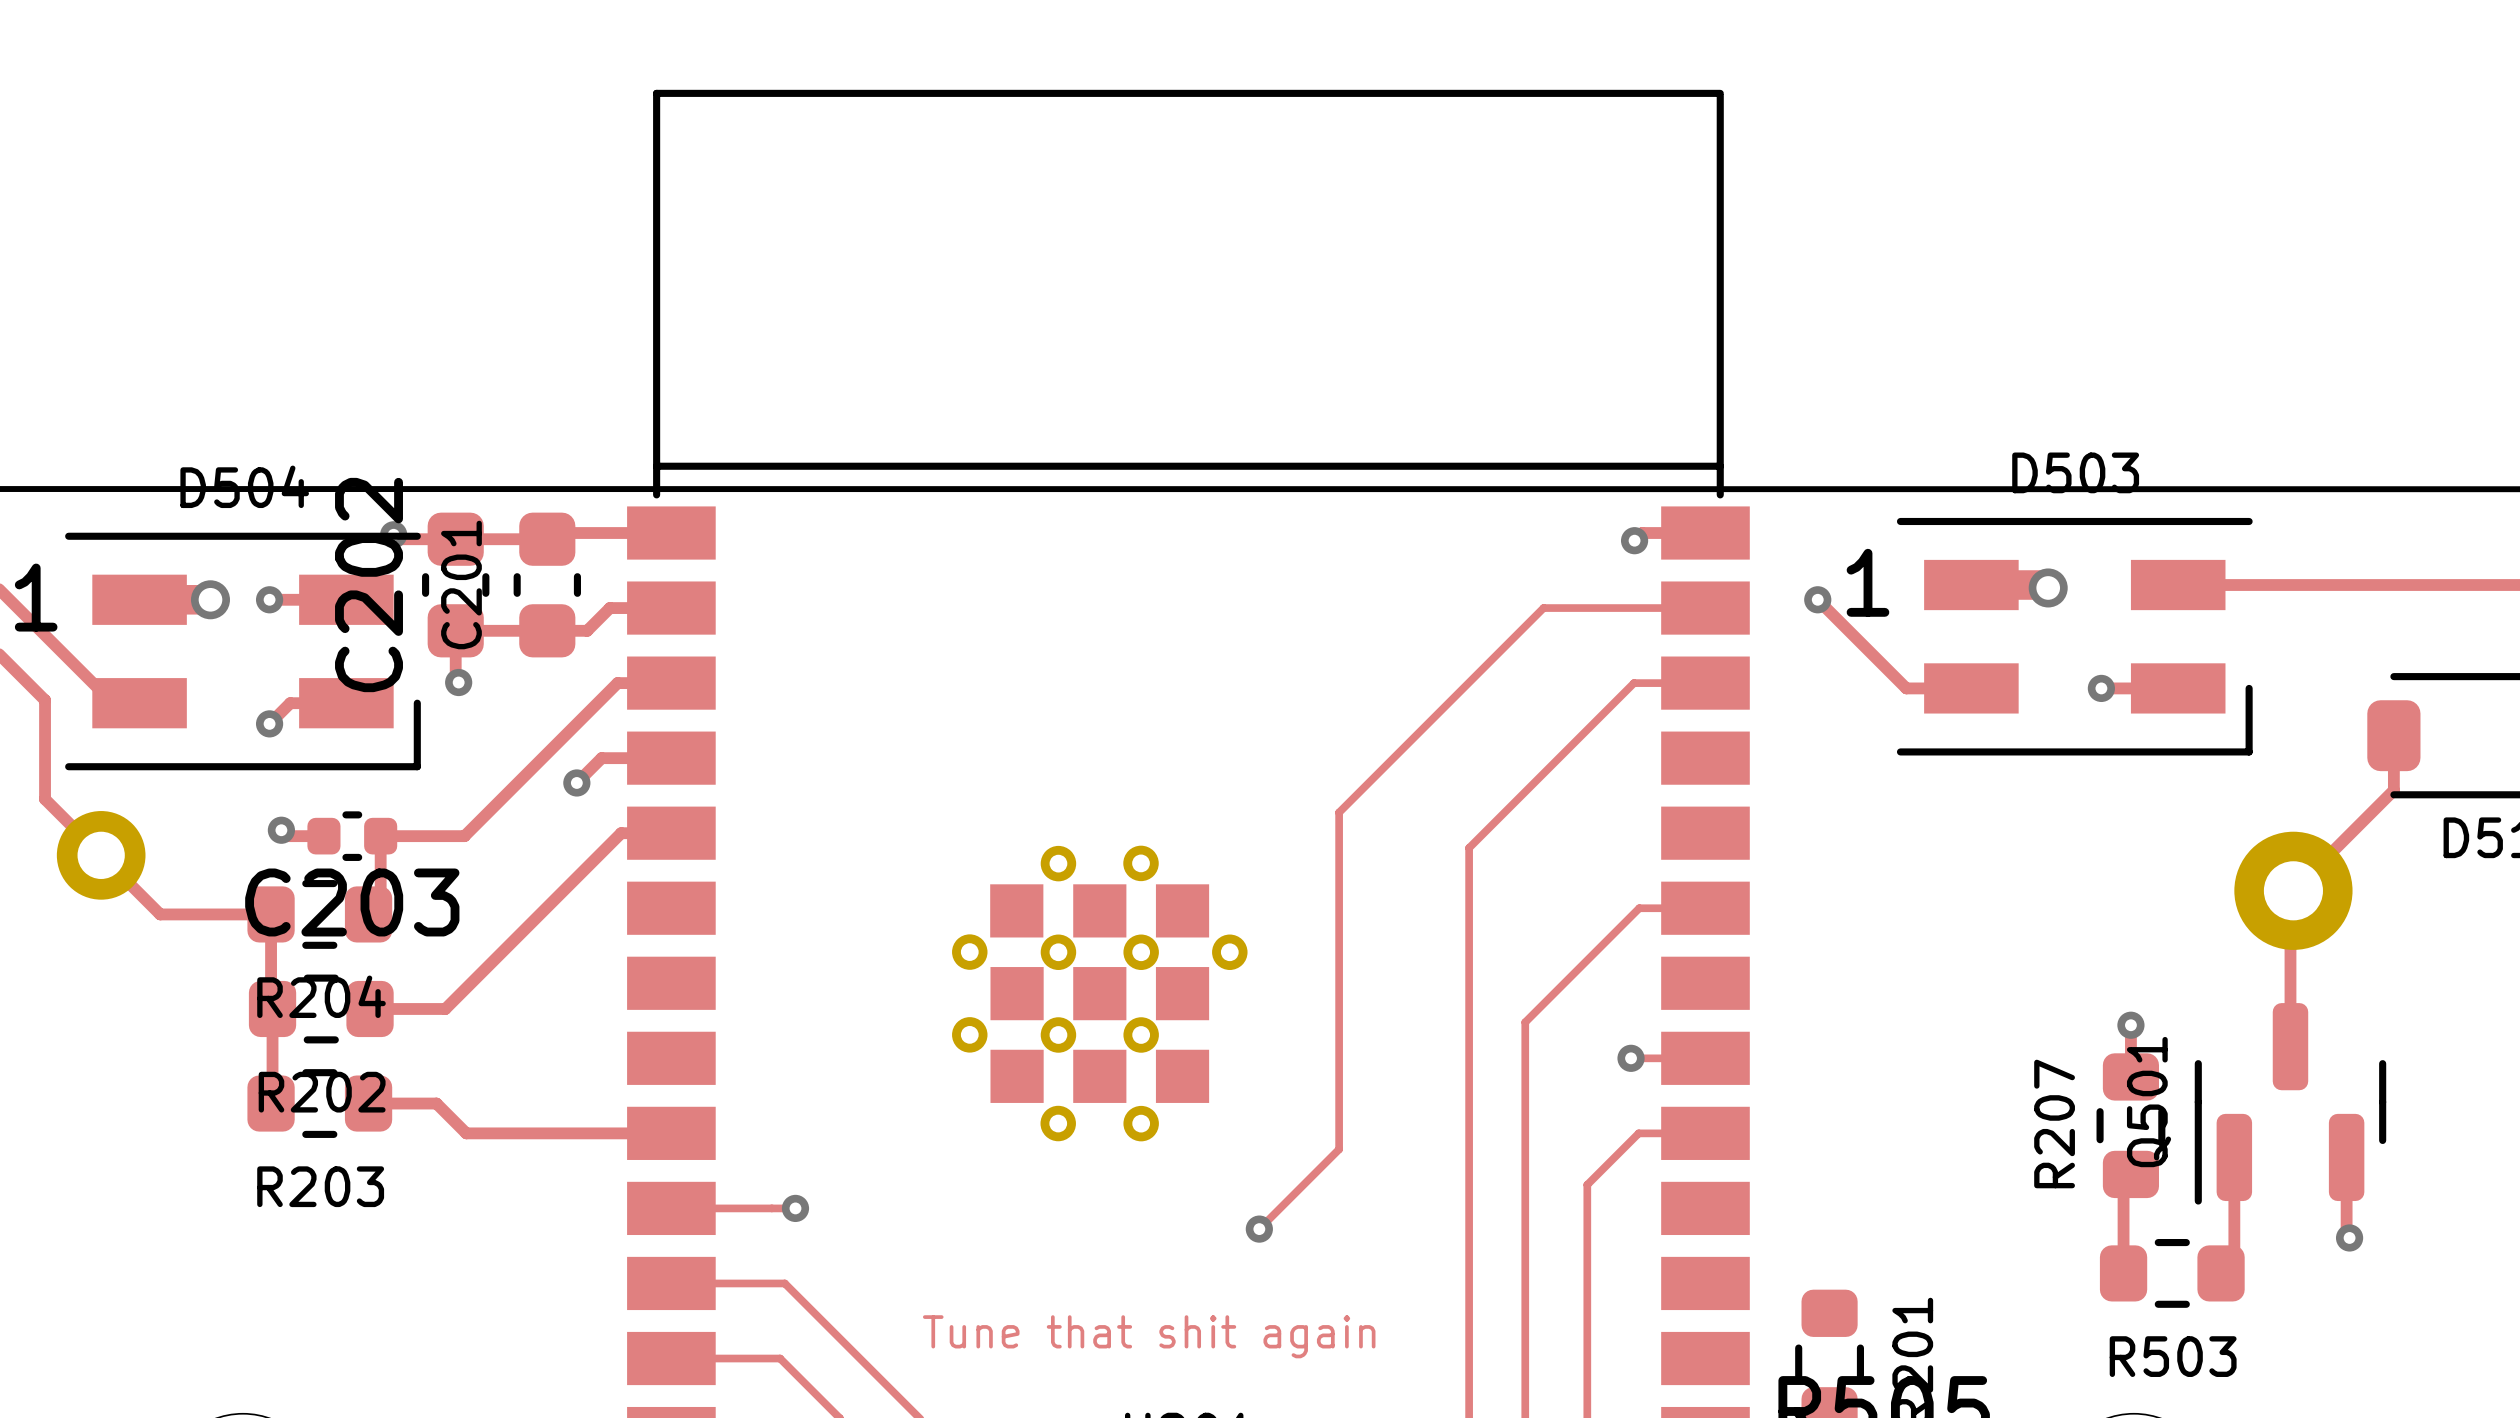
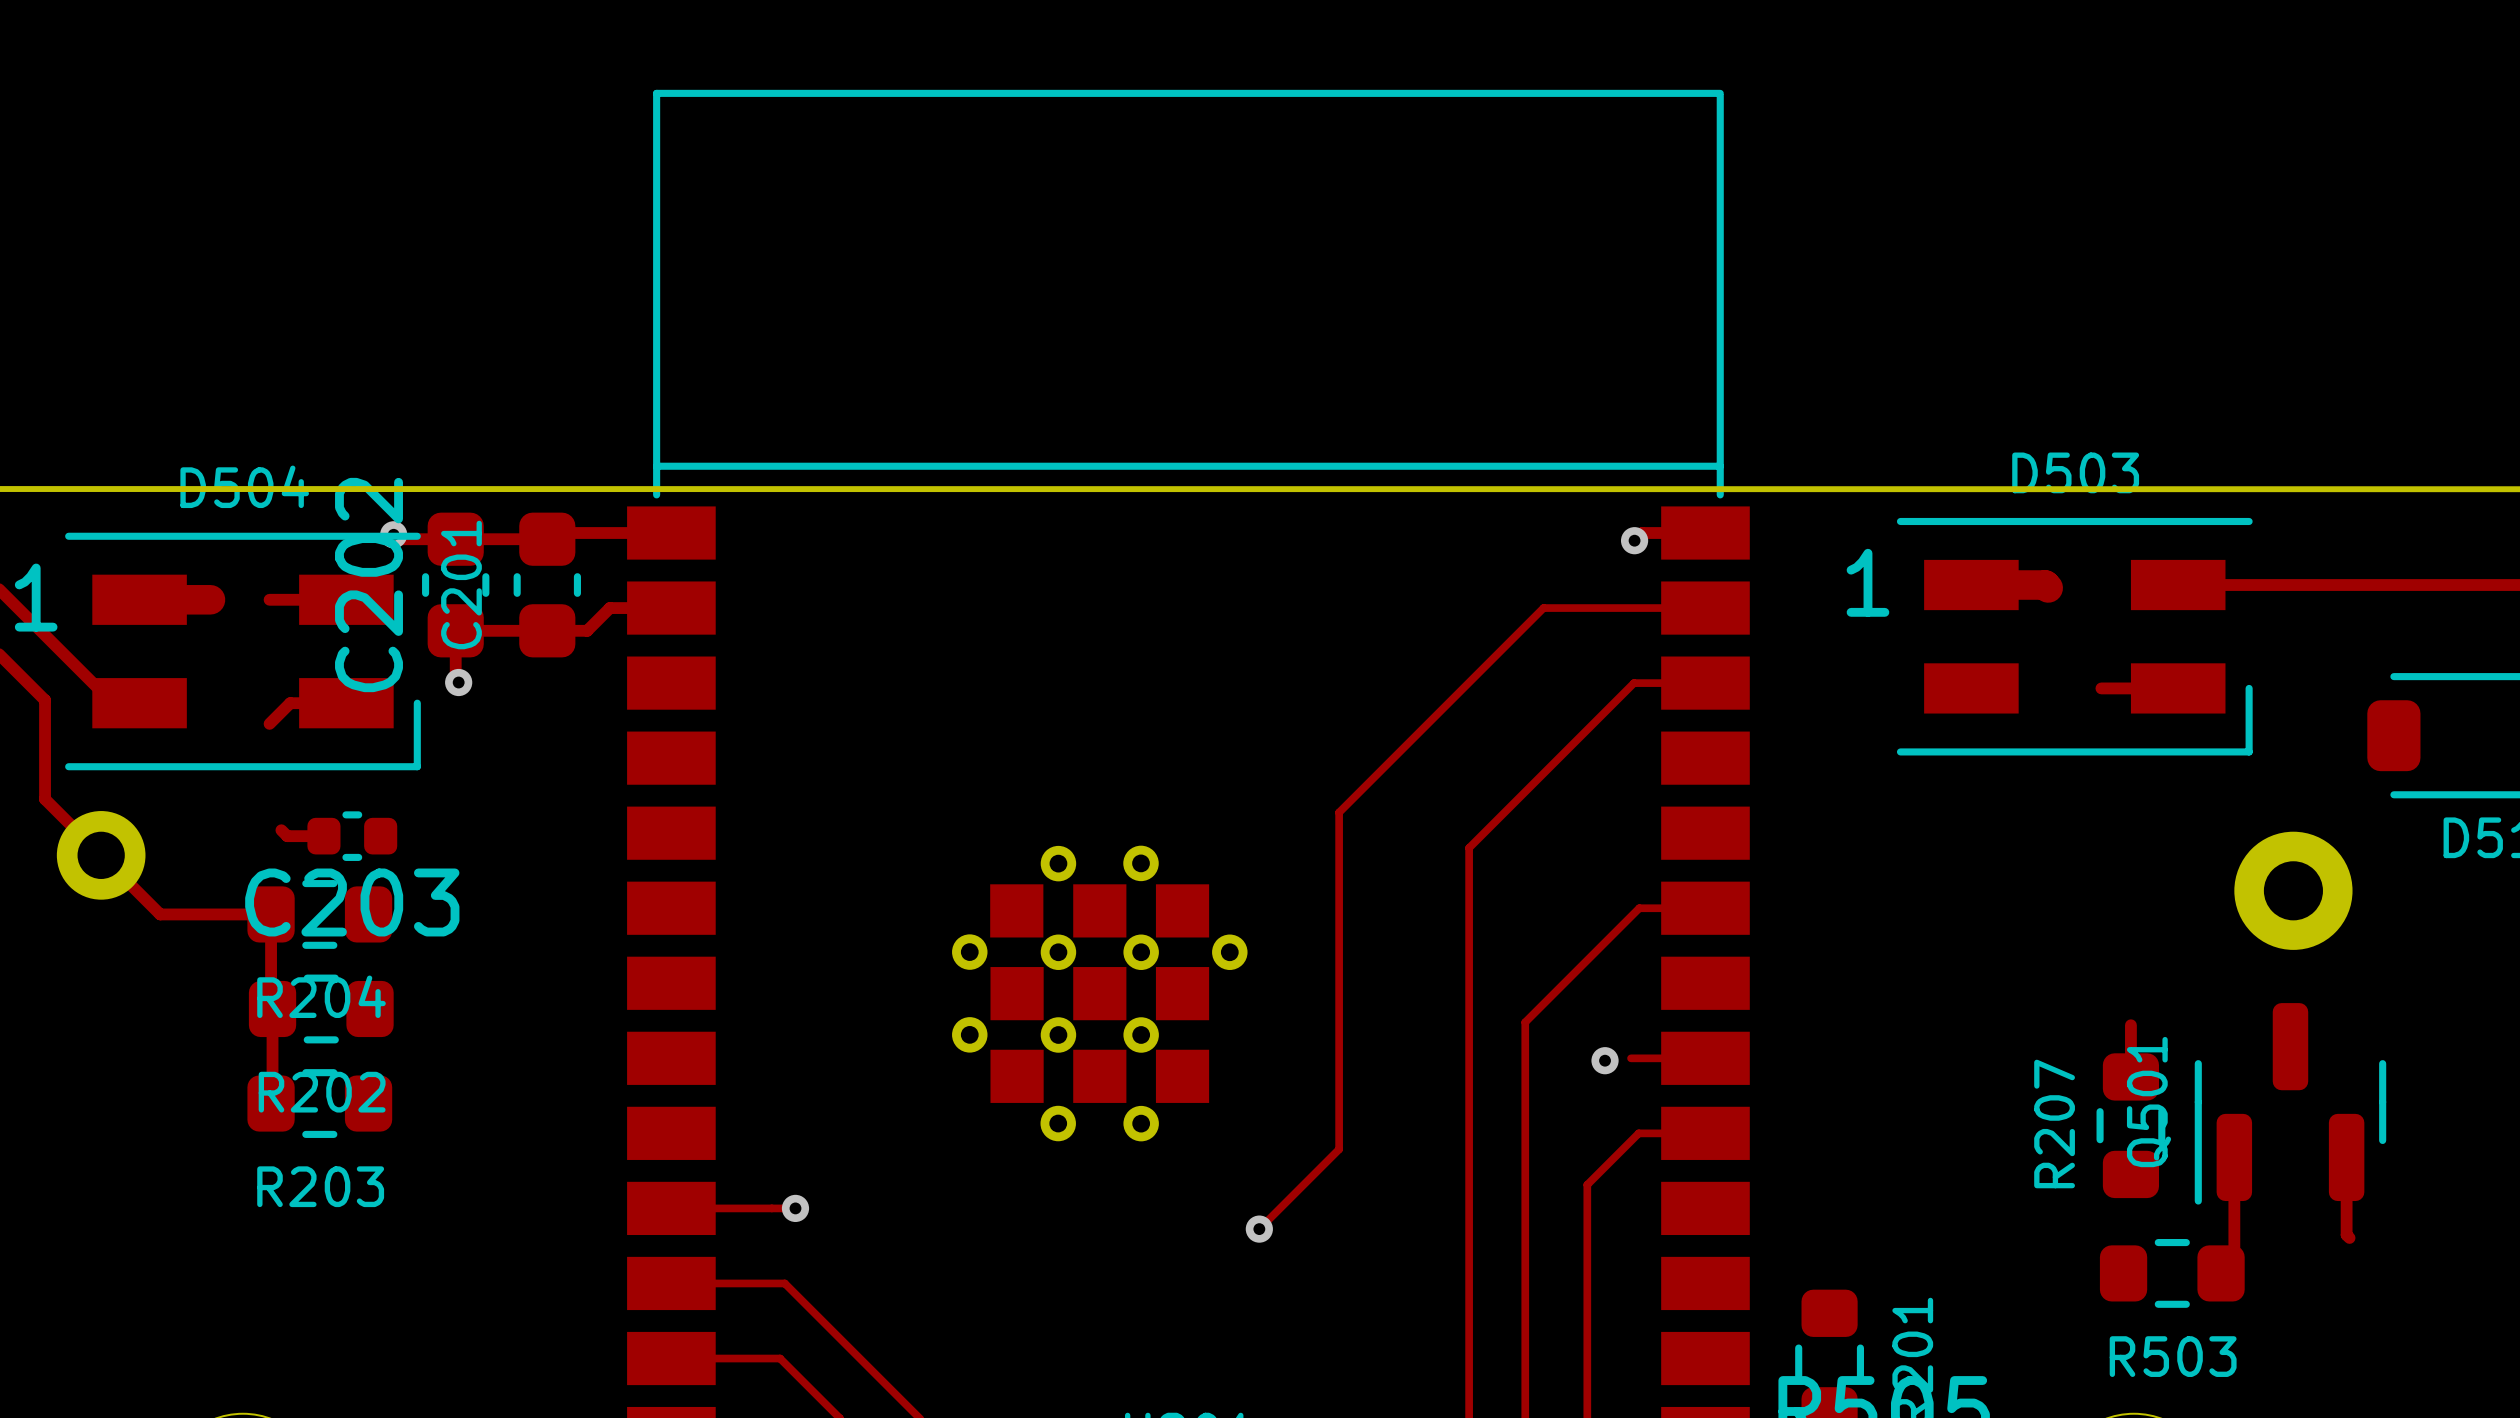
via: (2048, 587) -> none
via: (210, 599) -> none
via: (269, 599) -> none
track: (1817, 599) (1906, 688) (1971, 688) -> none
via: (1817, 599) -> none
track: (671, 683) (617, 683) (464, 836) (380, 836) (380, 902) (368, 914) -> none
via: (2101, 688) -> none
via: (269, 723) -> none
track: (2393, 735) (2393, 790) (2290, 893) (2290, 1046) -> none
track: (671, 758) (601, 758) (576, 782) -> none
via: (576, 782) -> none
via: (281, 830) -> none
track: (671, 833) (621, 833) (445, 1008) (370, 1008) -> none
via: (2130, 1025) -> none
via position: (1631, 1058) -> (1605, 1060)
track: (368, 1103) (436, 1103) (466, 1133) (671, 1133) -> none
track: (2130, 1174) (2123, 1181) (2123, 1273) -> none
via: (2349, 1237) -> none
text: Tune that shit again (1149, 1336) -> none

